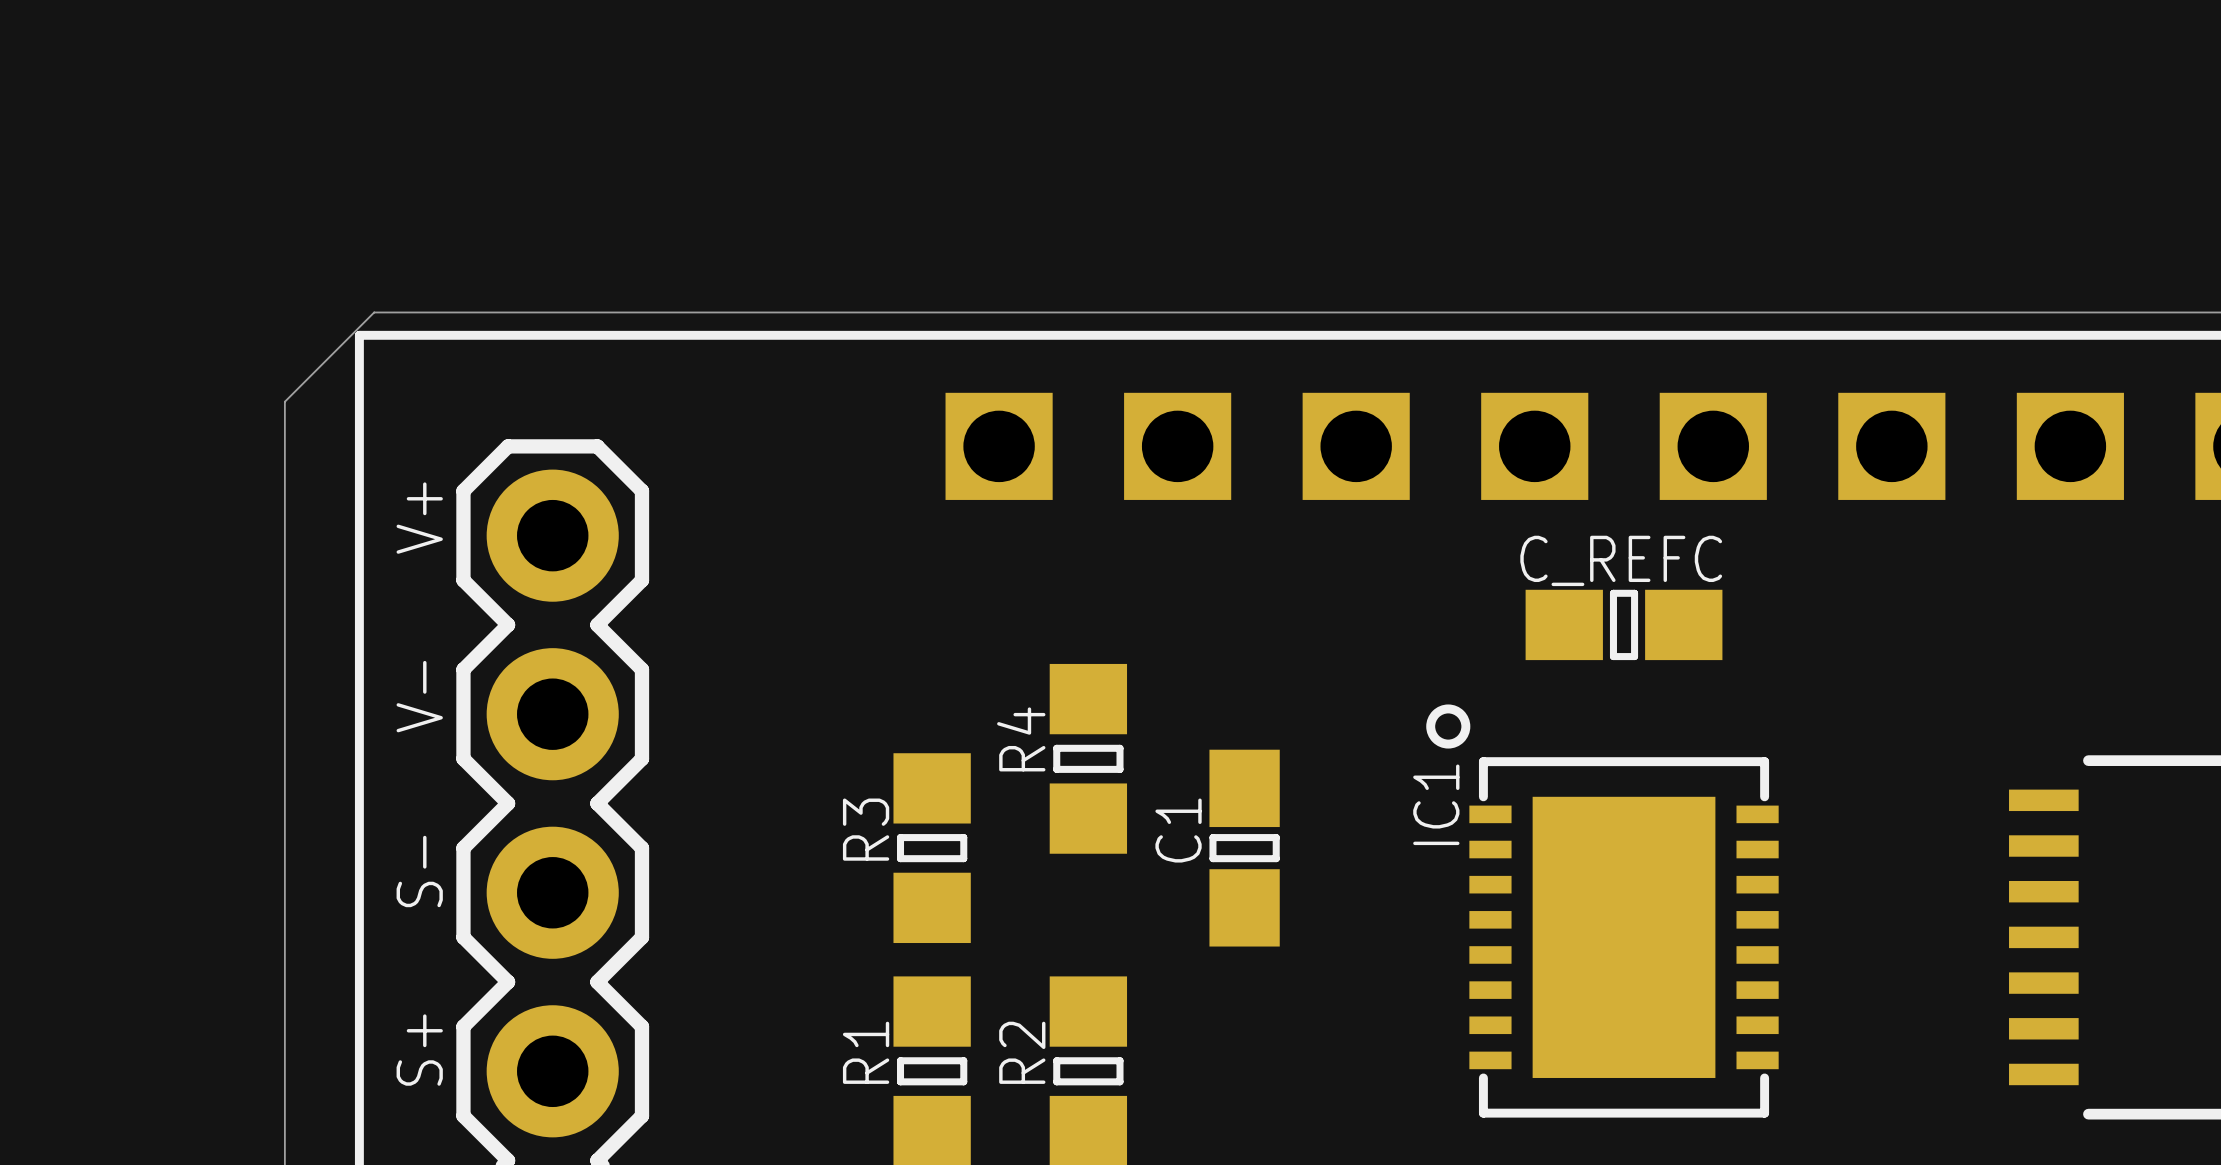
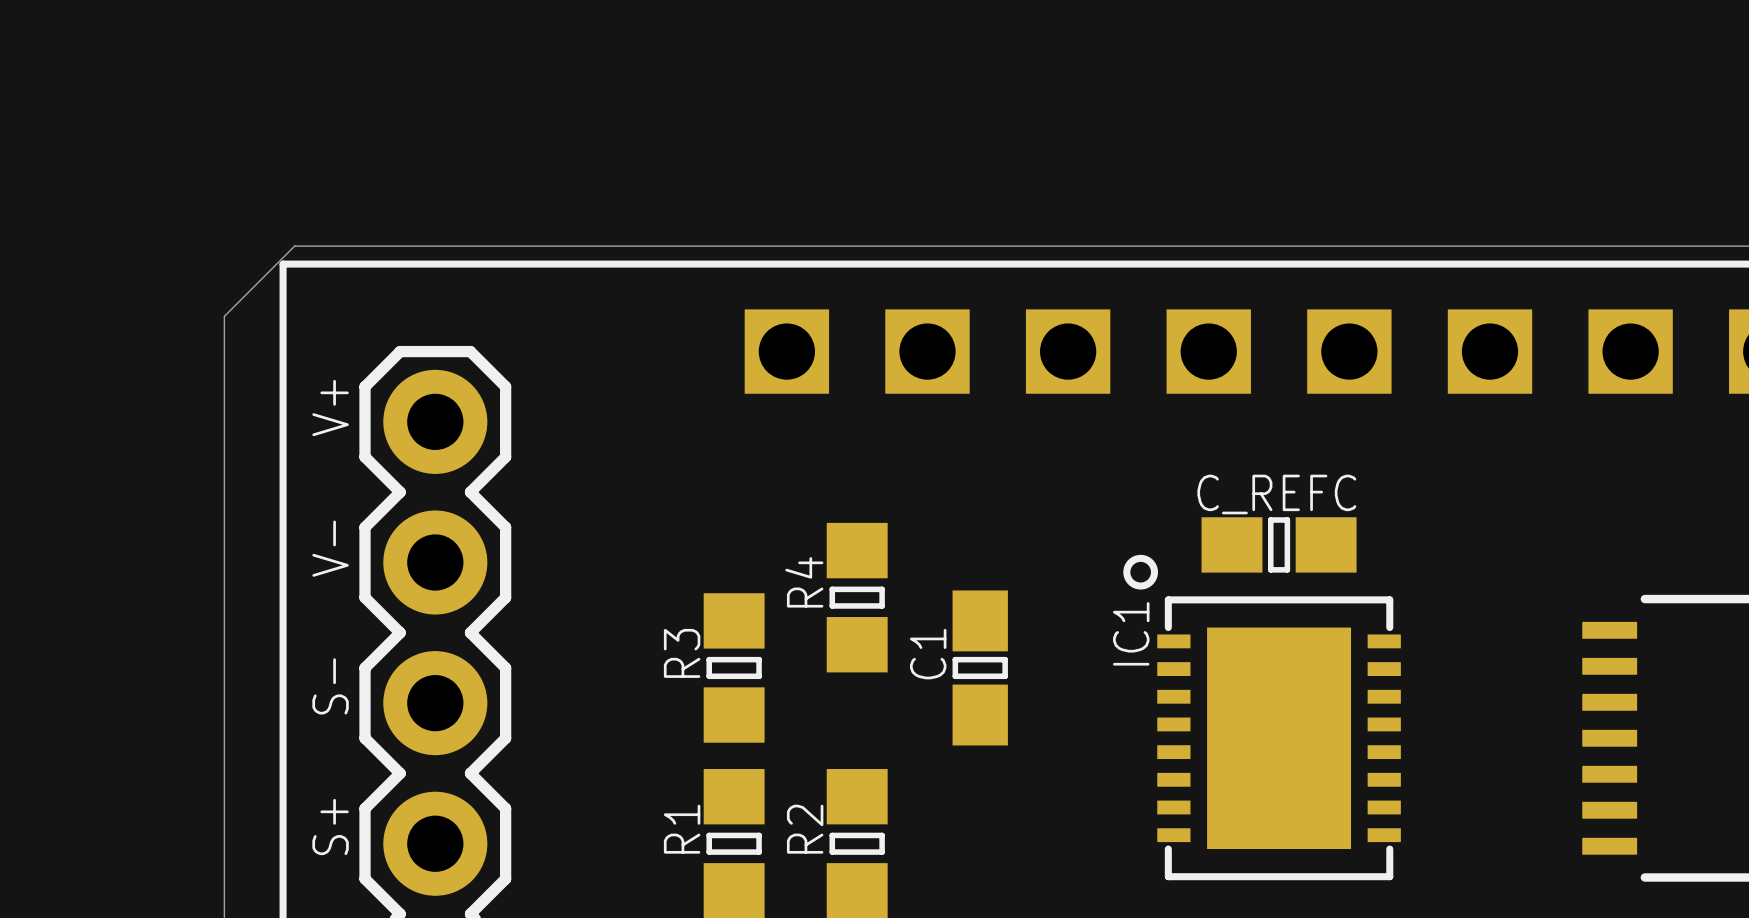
C_REFC position: (1624, 624) -> (1279, 544)

